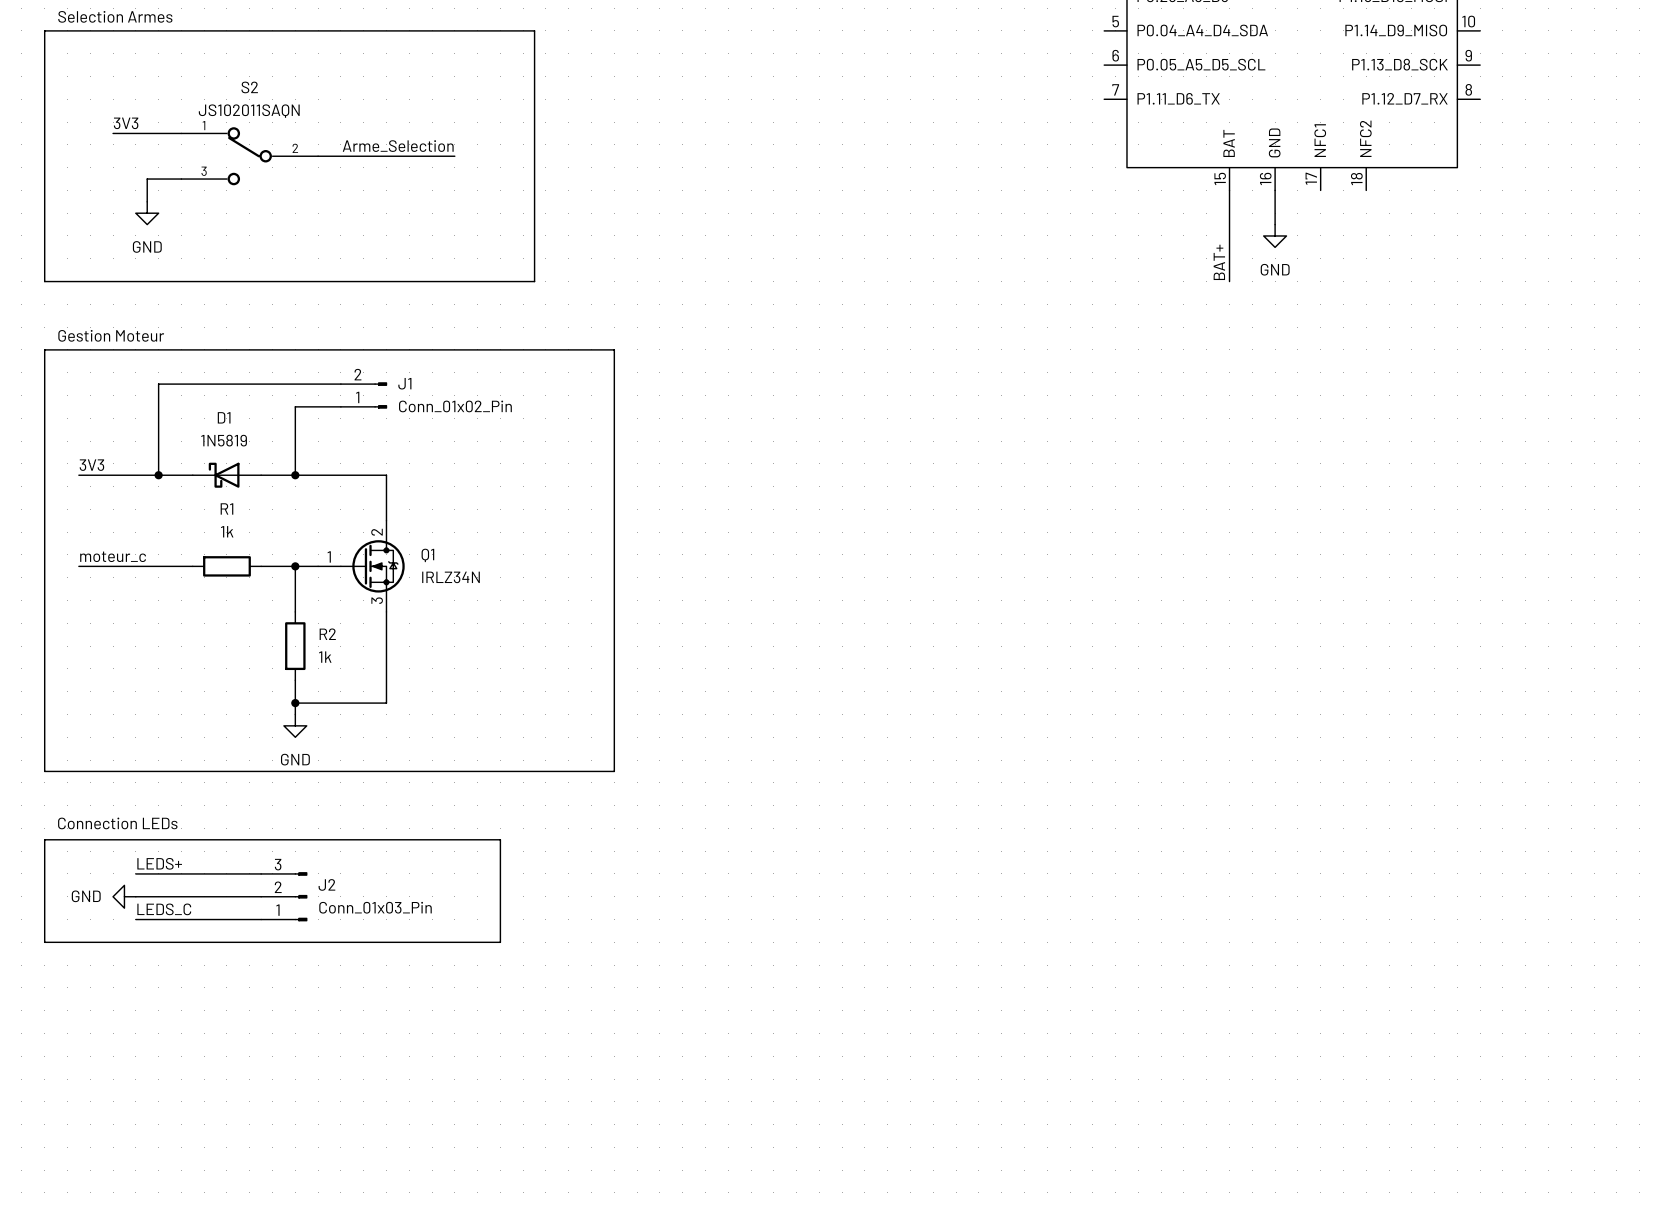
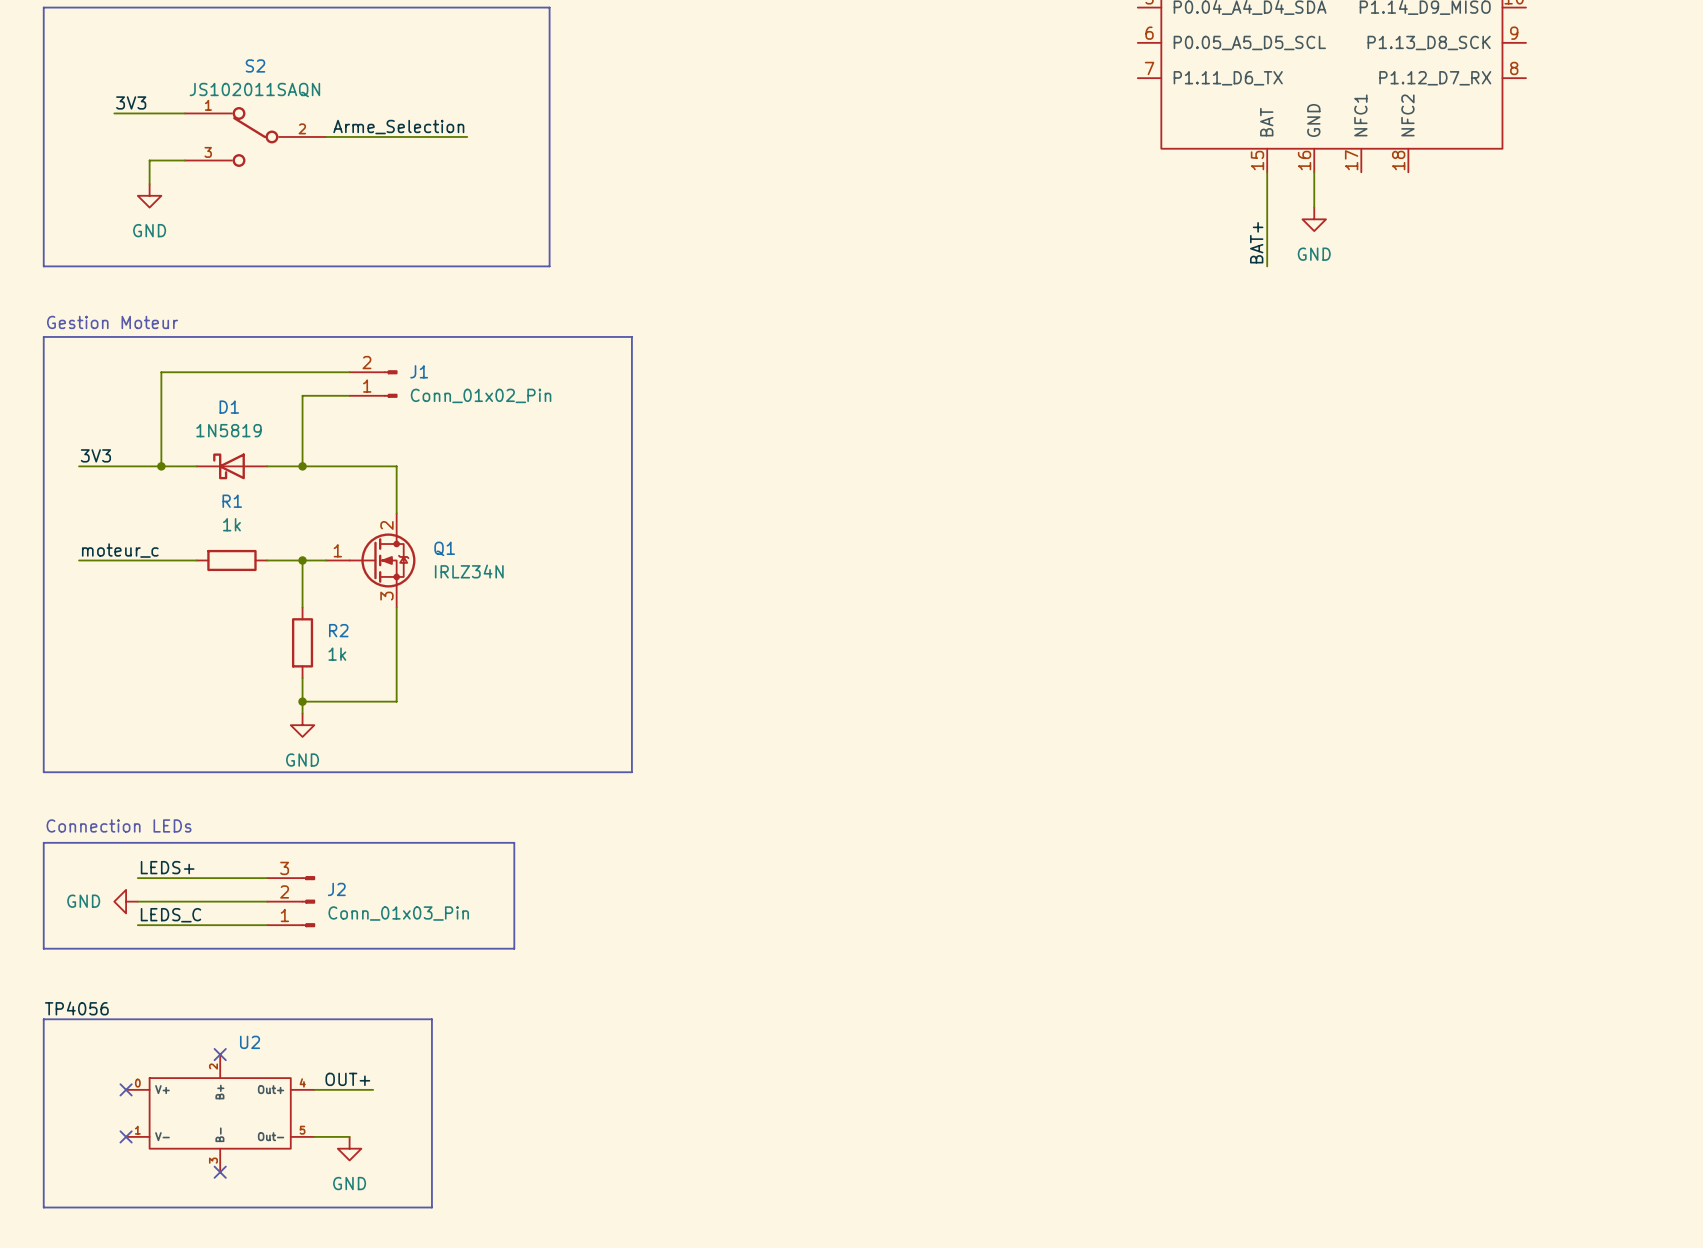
label: none -> TP4056 (76, 1008)
line: none -> (43, 1019) (431, 1019) (431, 1207) (43, 1207) (43, 1019)
no-connect mark: none -> (220, 1054)
label: none -> OUT+ (347, 1079)
no-connect mark: none -> (126, 1089)
wire: none -> (314, 1089) (373, 1089)
U2: none -> (220, 1113)
no-connect mark: none -> (126, 1136)
wire: none -> (314, 1136) (349, 1136)
power symbol: none -> GND (349, 1148)
no-connect mark: none -> (220, 1172)

